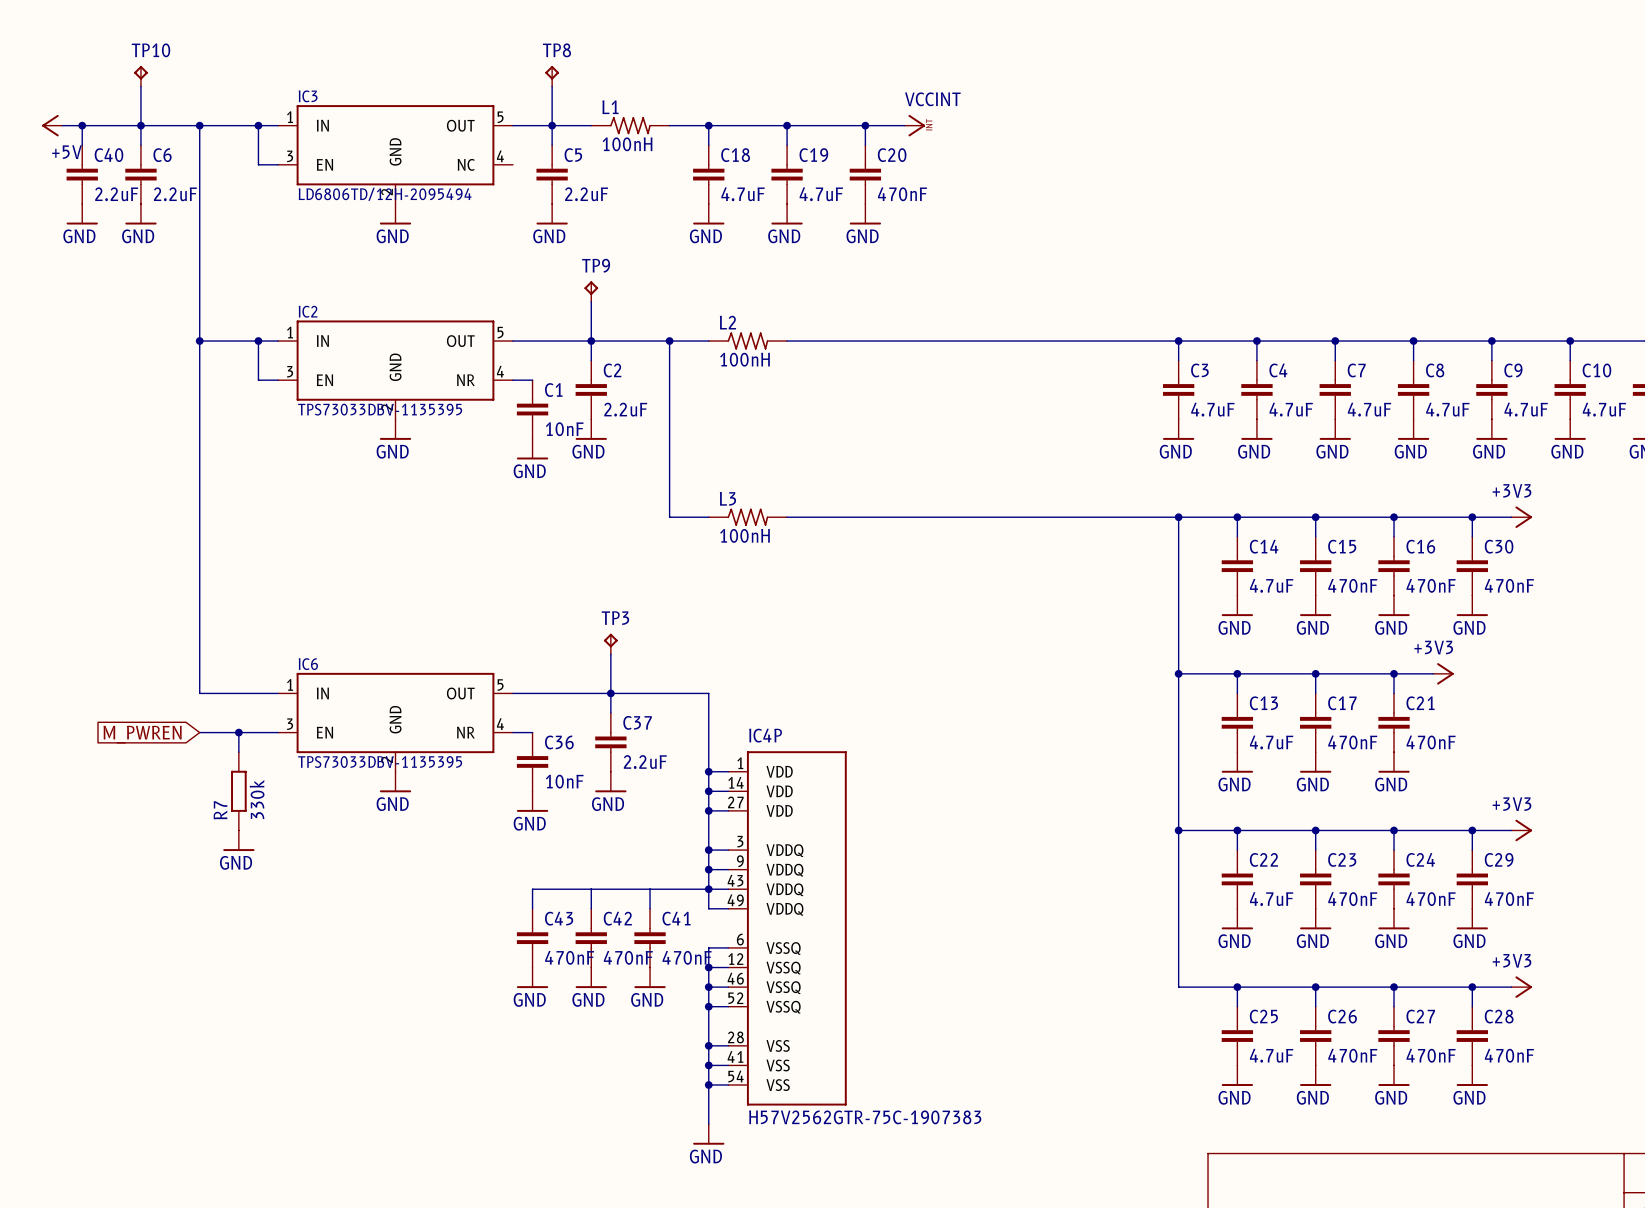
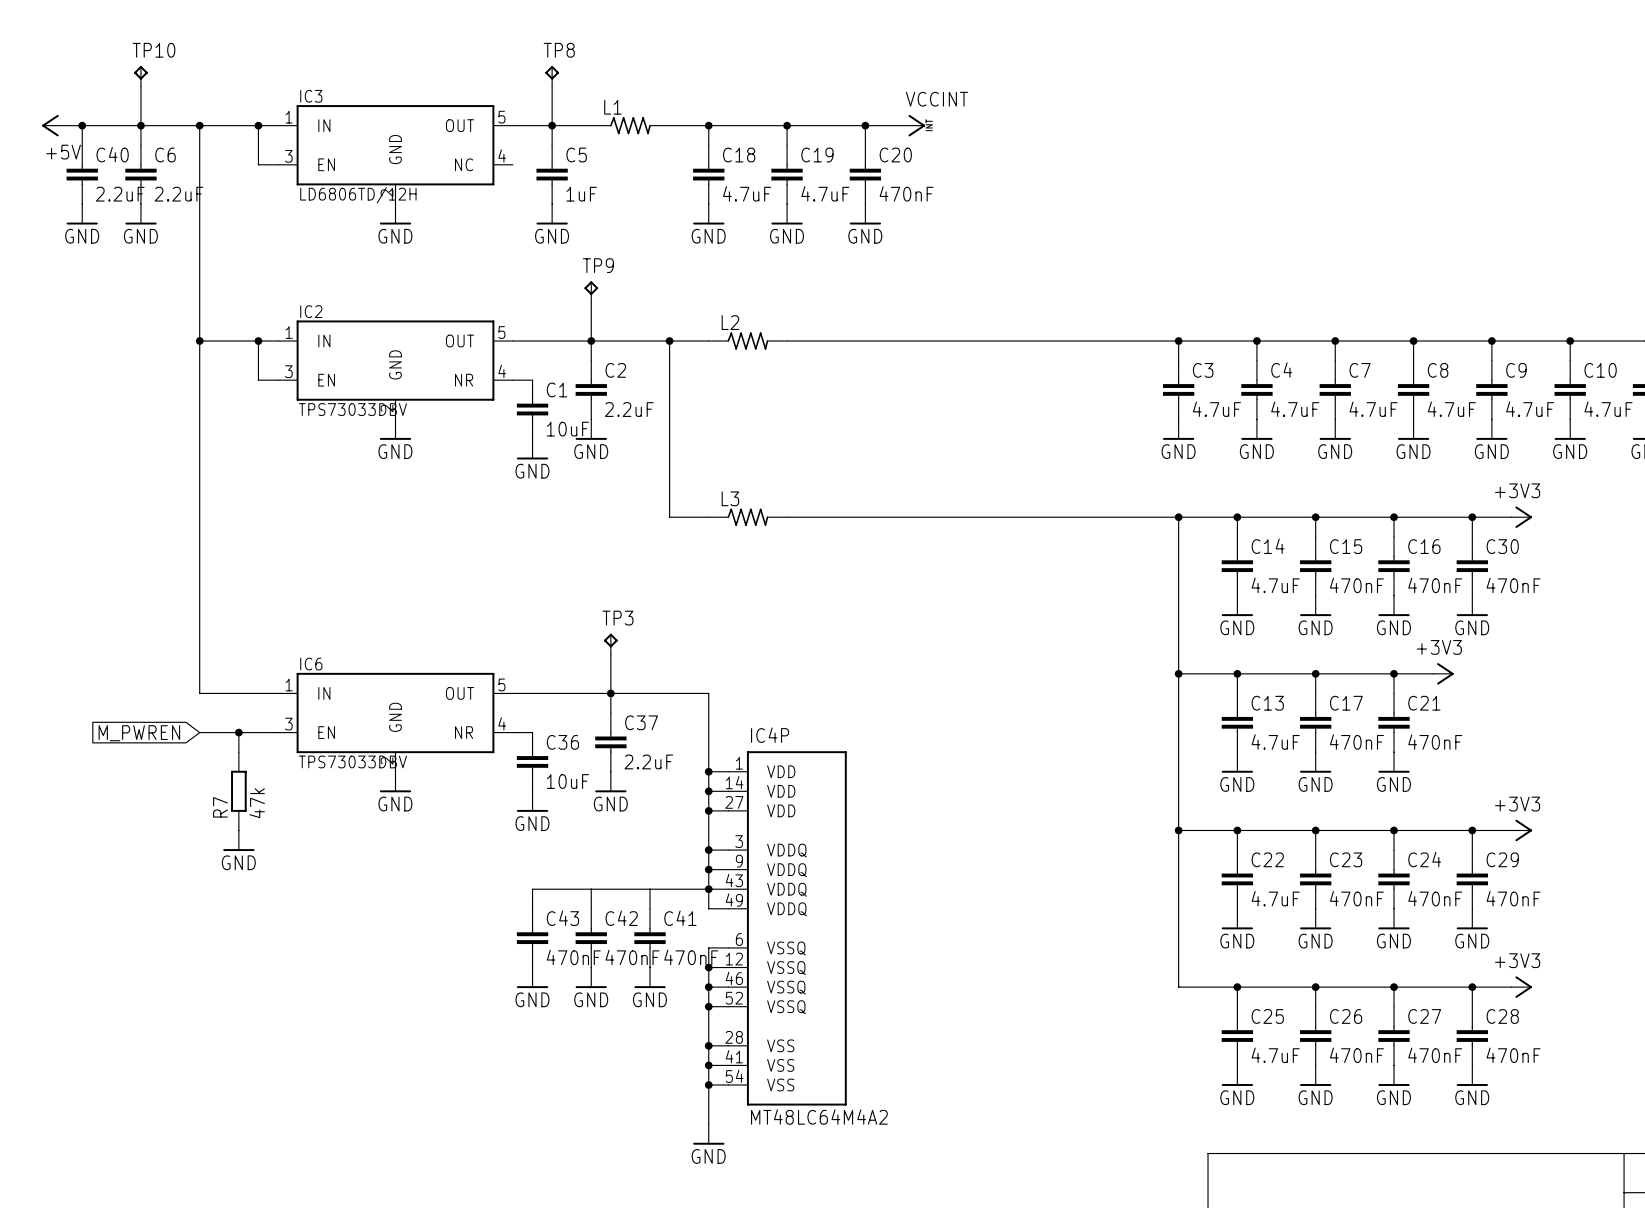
L1 value: 100nH (627, 144) -> none
IC3 value: LD6806TD/12H-2095494 (385, 194) -> LD6806TD/12H (358, 195)
C5 value: 2.2uF (586, 194) -> 1uF (581, 194)
L2 value: 100nH (744, 359) -> none
IC2 value: TPS73033DBV-1135395 (380, 409) -> TPS73033DBV (352, 409)
C1 value: 10nF (564, 429) -> 10uF (567, 429)
L3 value: 100nH (744, 535) -> none
IC6 value: TPS73033DBV-1135395 (380, 762) -> TPS73033DBV (352, 761)
C36 value: 10nF (564, 781) -> 10uF (567, 781)
R7 value: 330k (257, 799) -> 47k (257, 803)
IC4P value: H57V2562GTR-75C-1907383 (865, 1117) -> MT48LC64M4A2 (819, 1116)

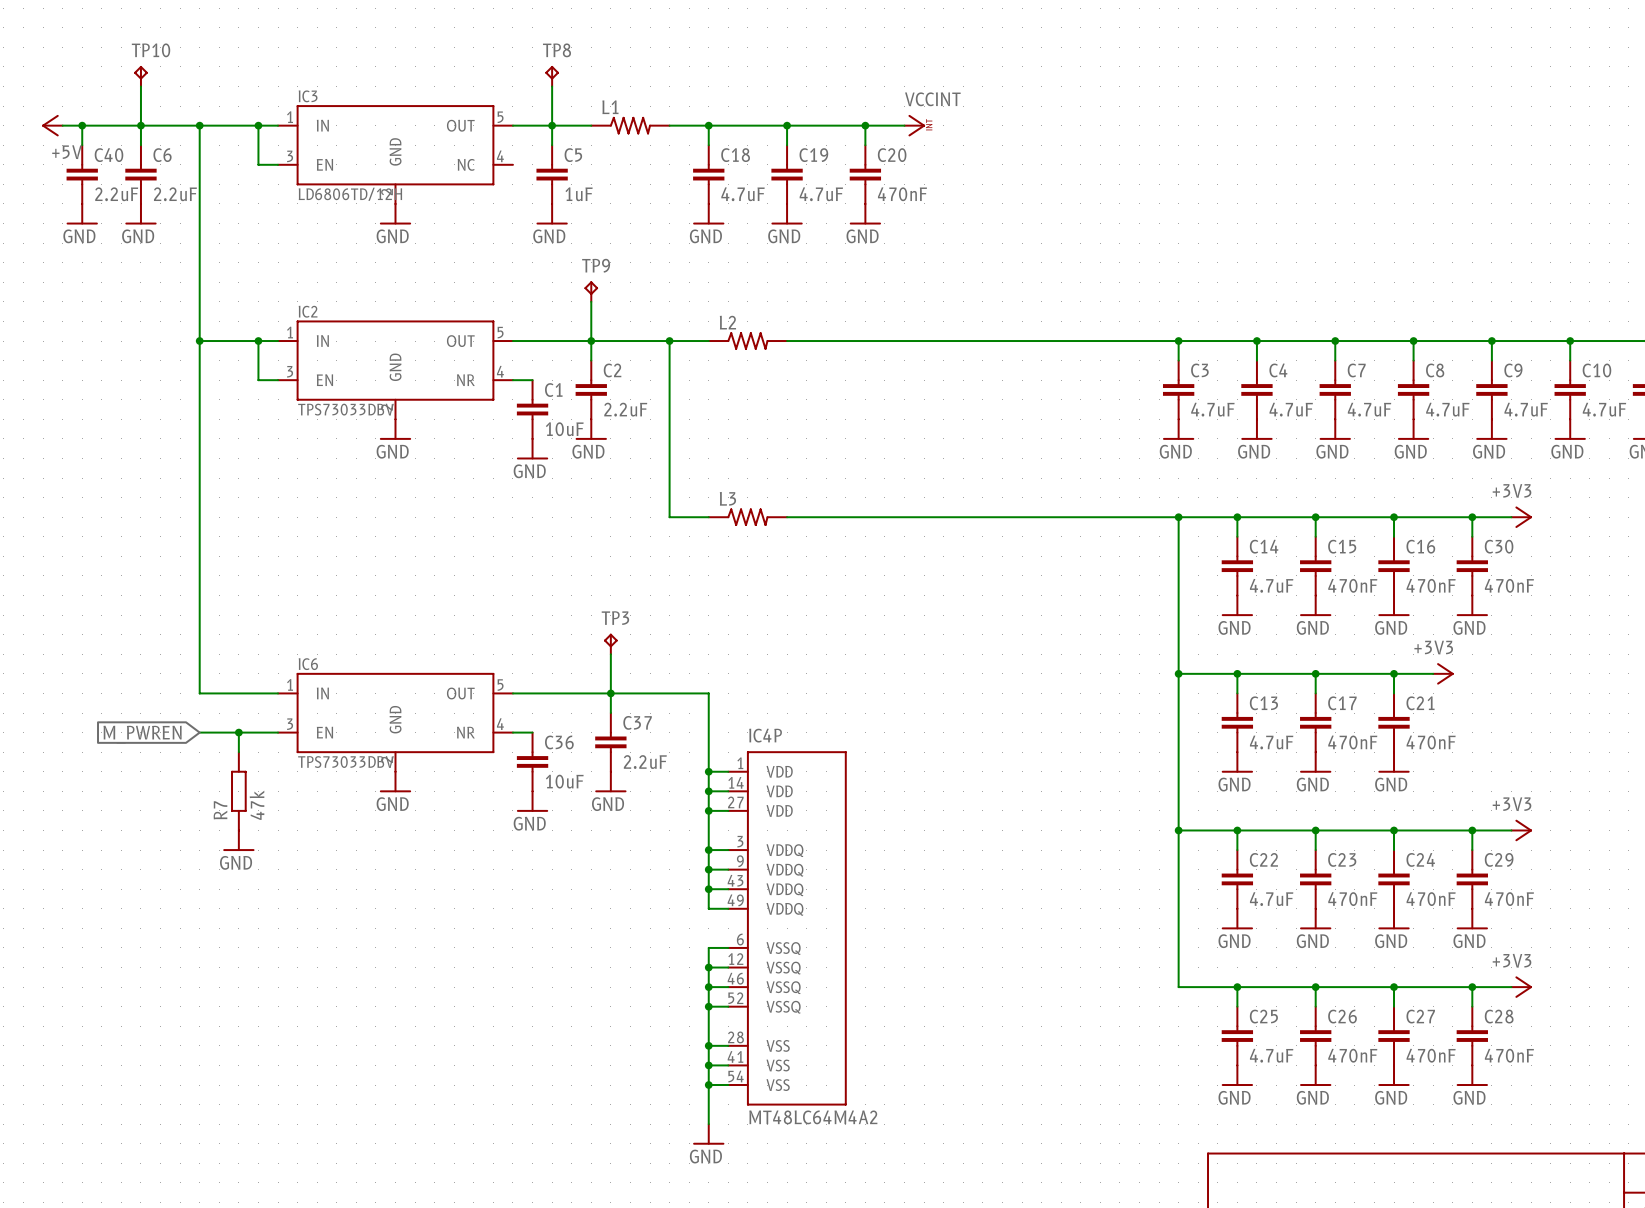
wire: (591, 889) (591, 908) -> none
wire: (650, 889) (650, 908) -> none
wire: (708, 889) (532, 889) (532, 908) -> none
C43: 470nF (532, 938) -> none
C42: 470nF (591, 938) -> none
C41: 470nF (650, 938) -> none
power symbol: GND (532, 977) -> none
power symbol: GND (591, 977) -> none
power symbol: GND (650, 977) -> none

